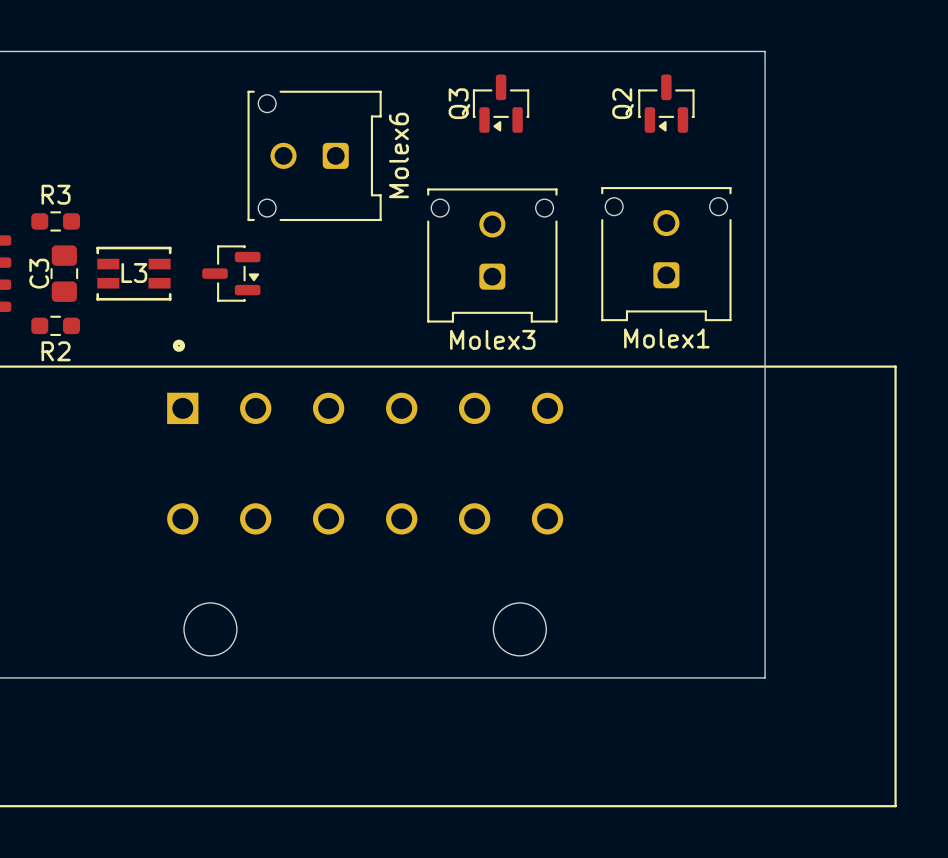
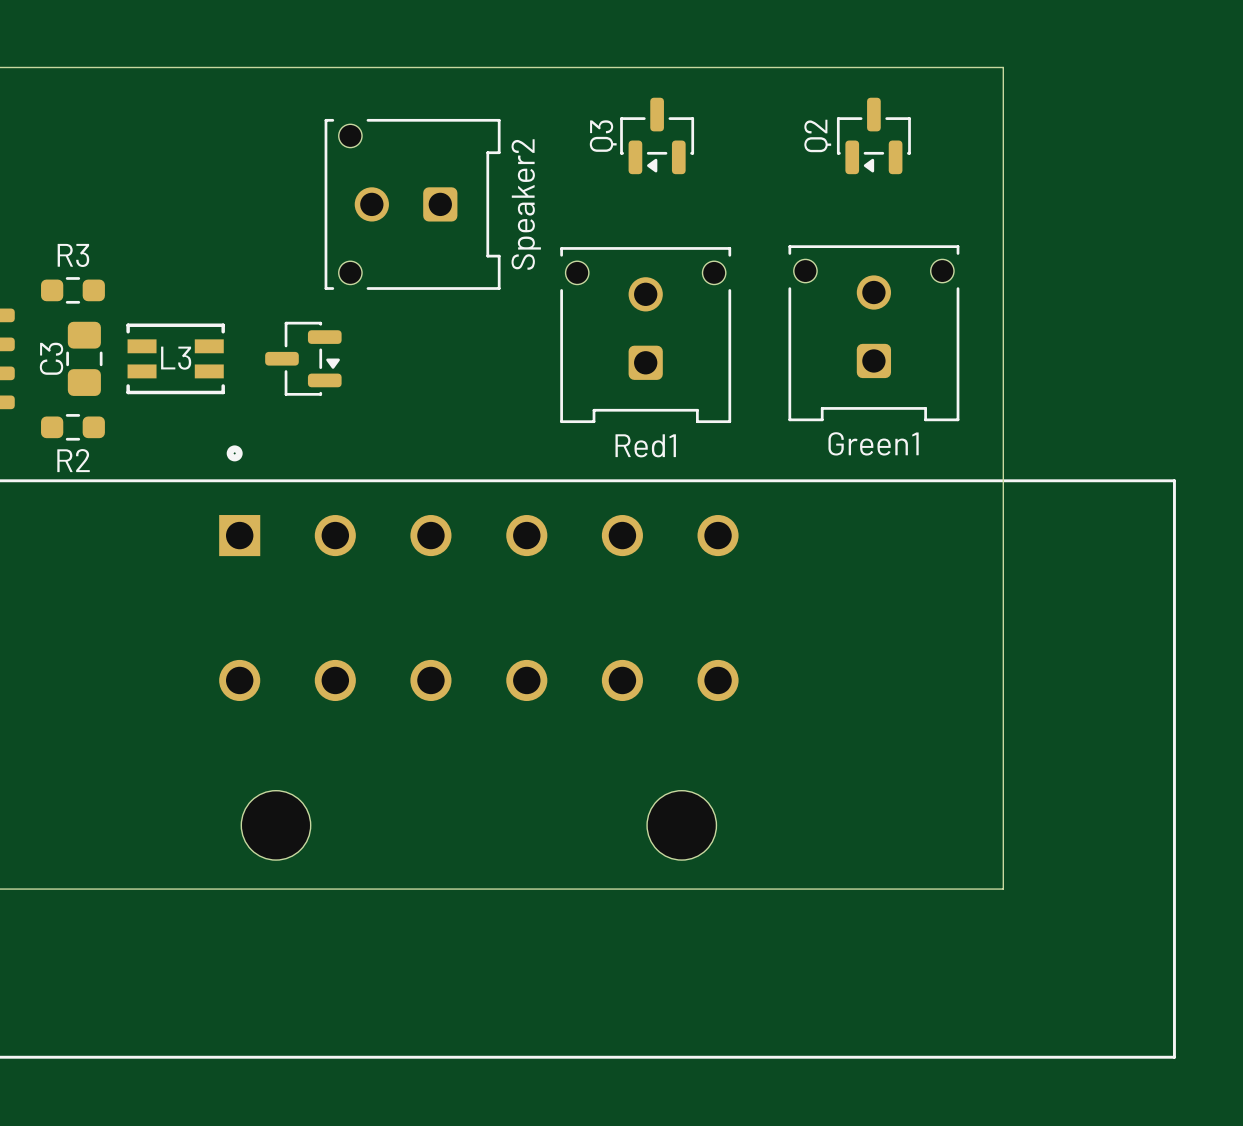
Molex6 name: Molex6 (398, 155) -> Speaker2 (526, 204)
Molex1 name: Molex1 (666, 338) -> Green1 (873, 443)
Molex3 name: Molex3 (492, 339) -> Red1 (645, 445)

